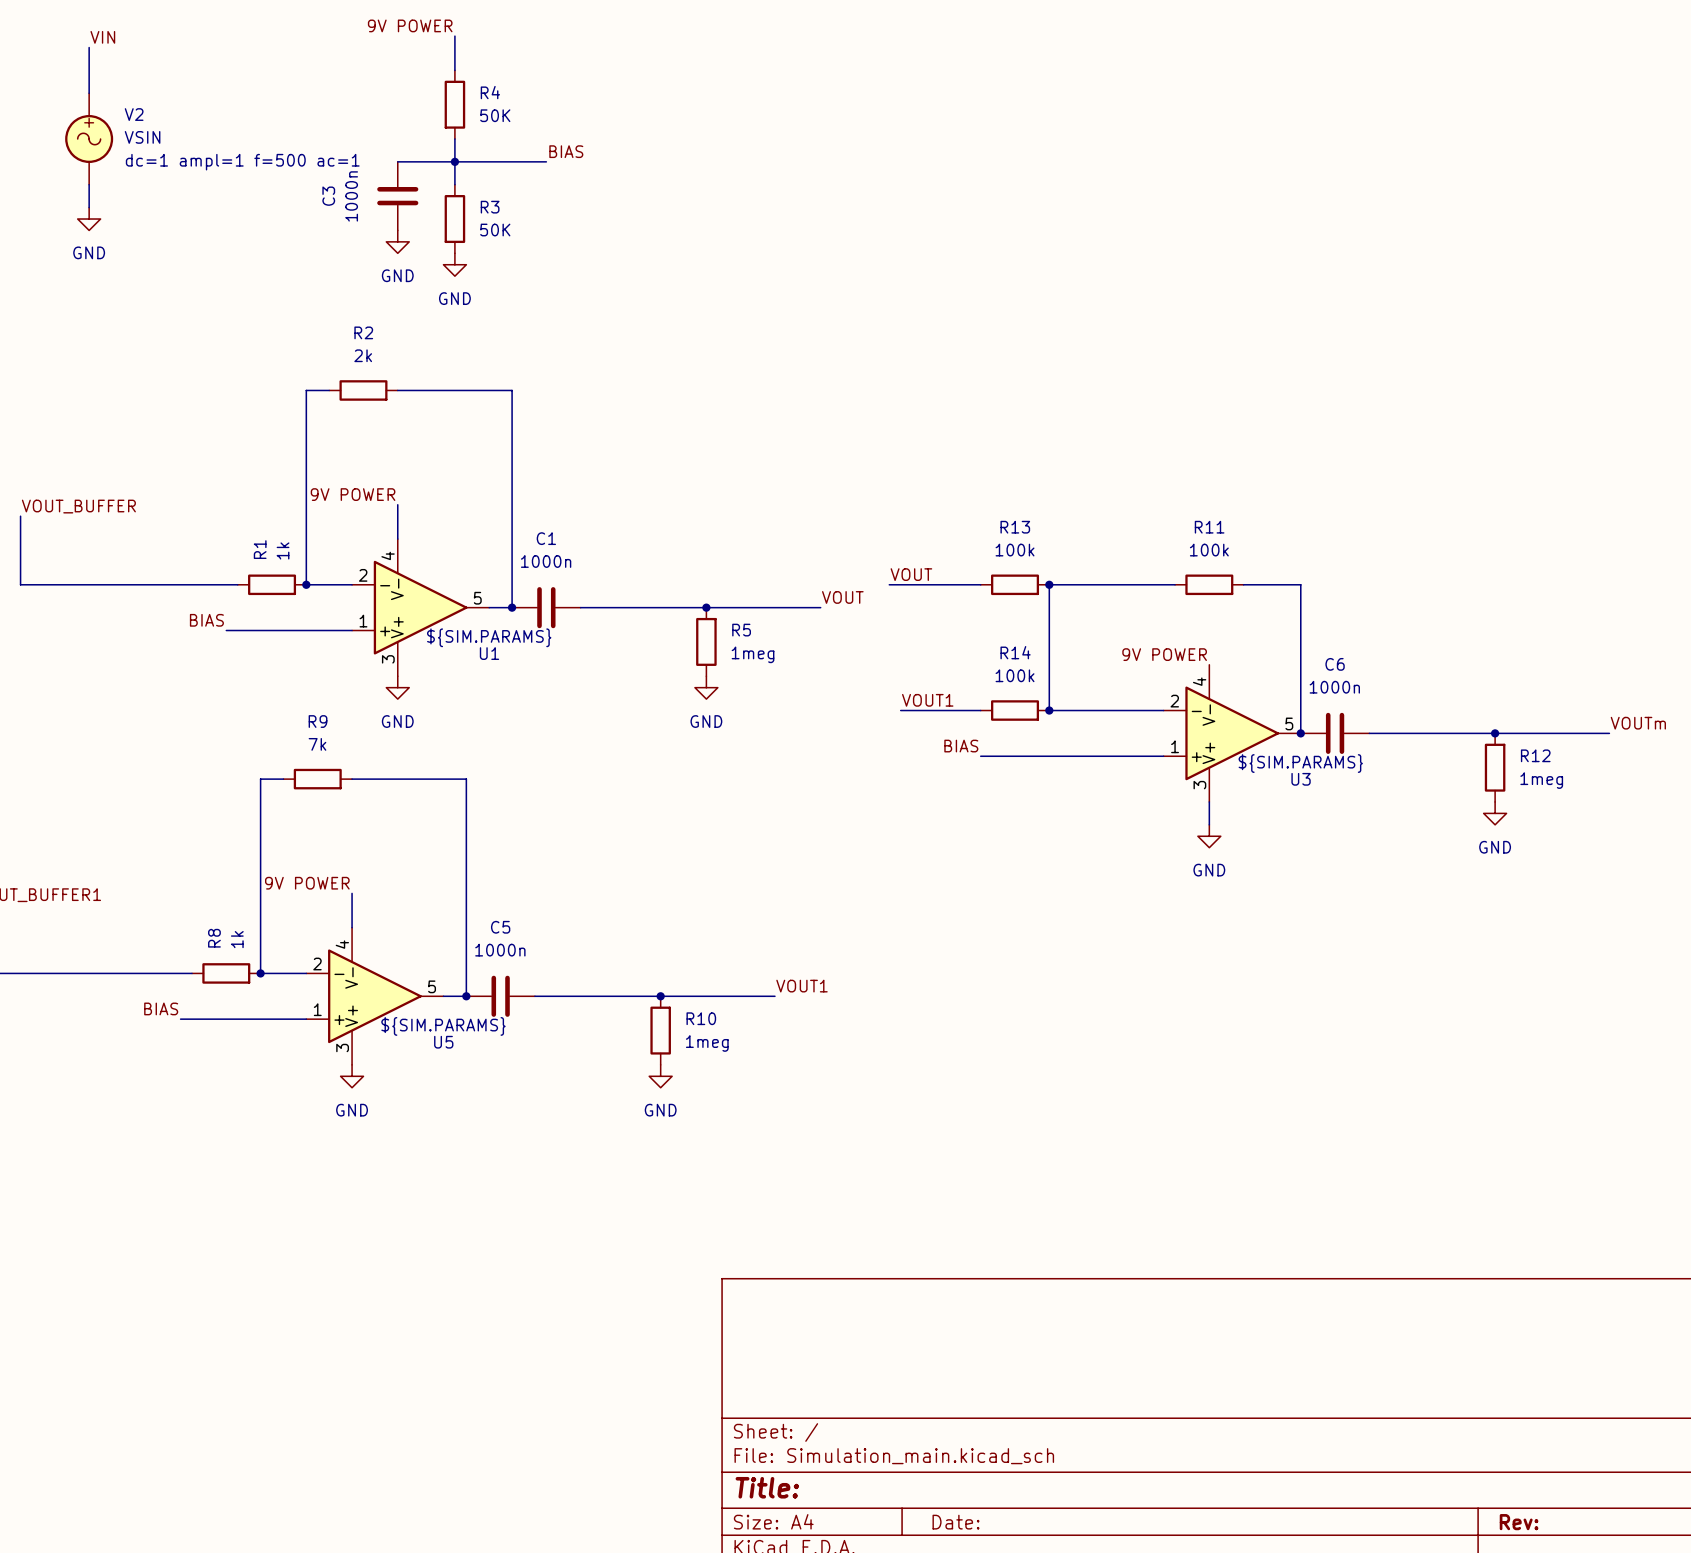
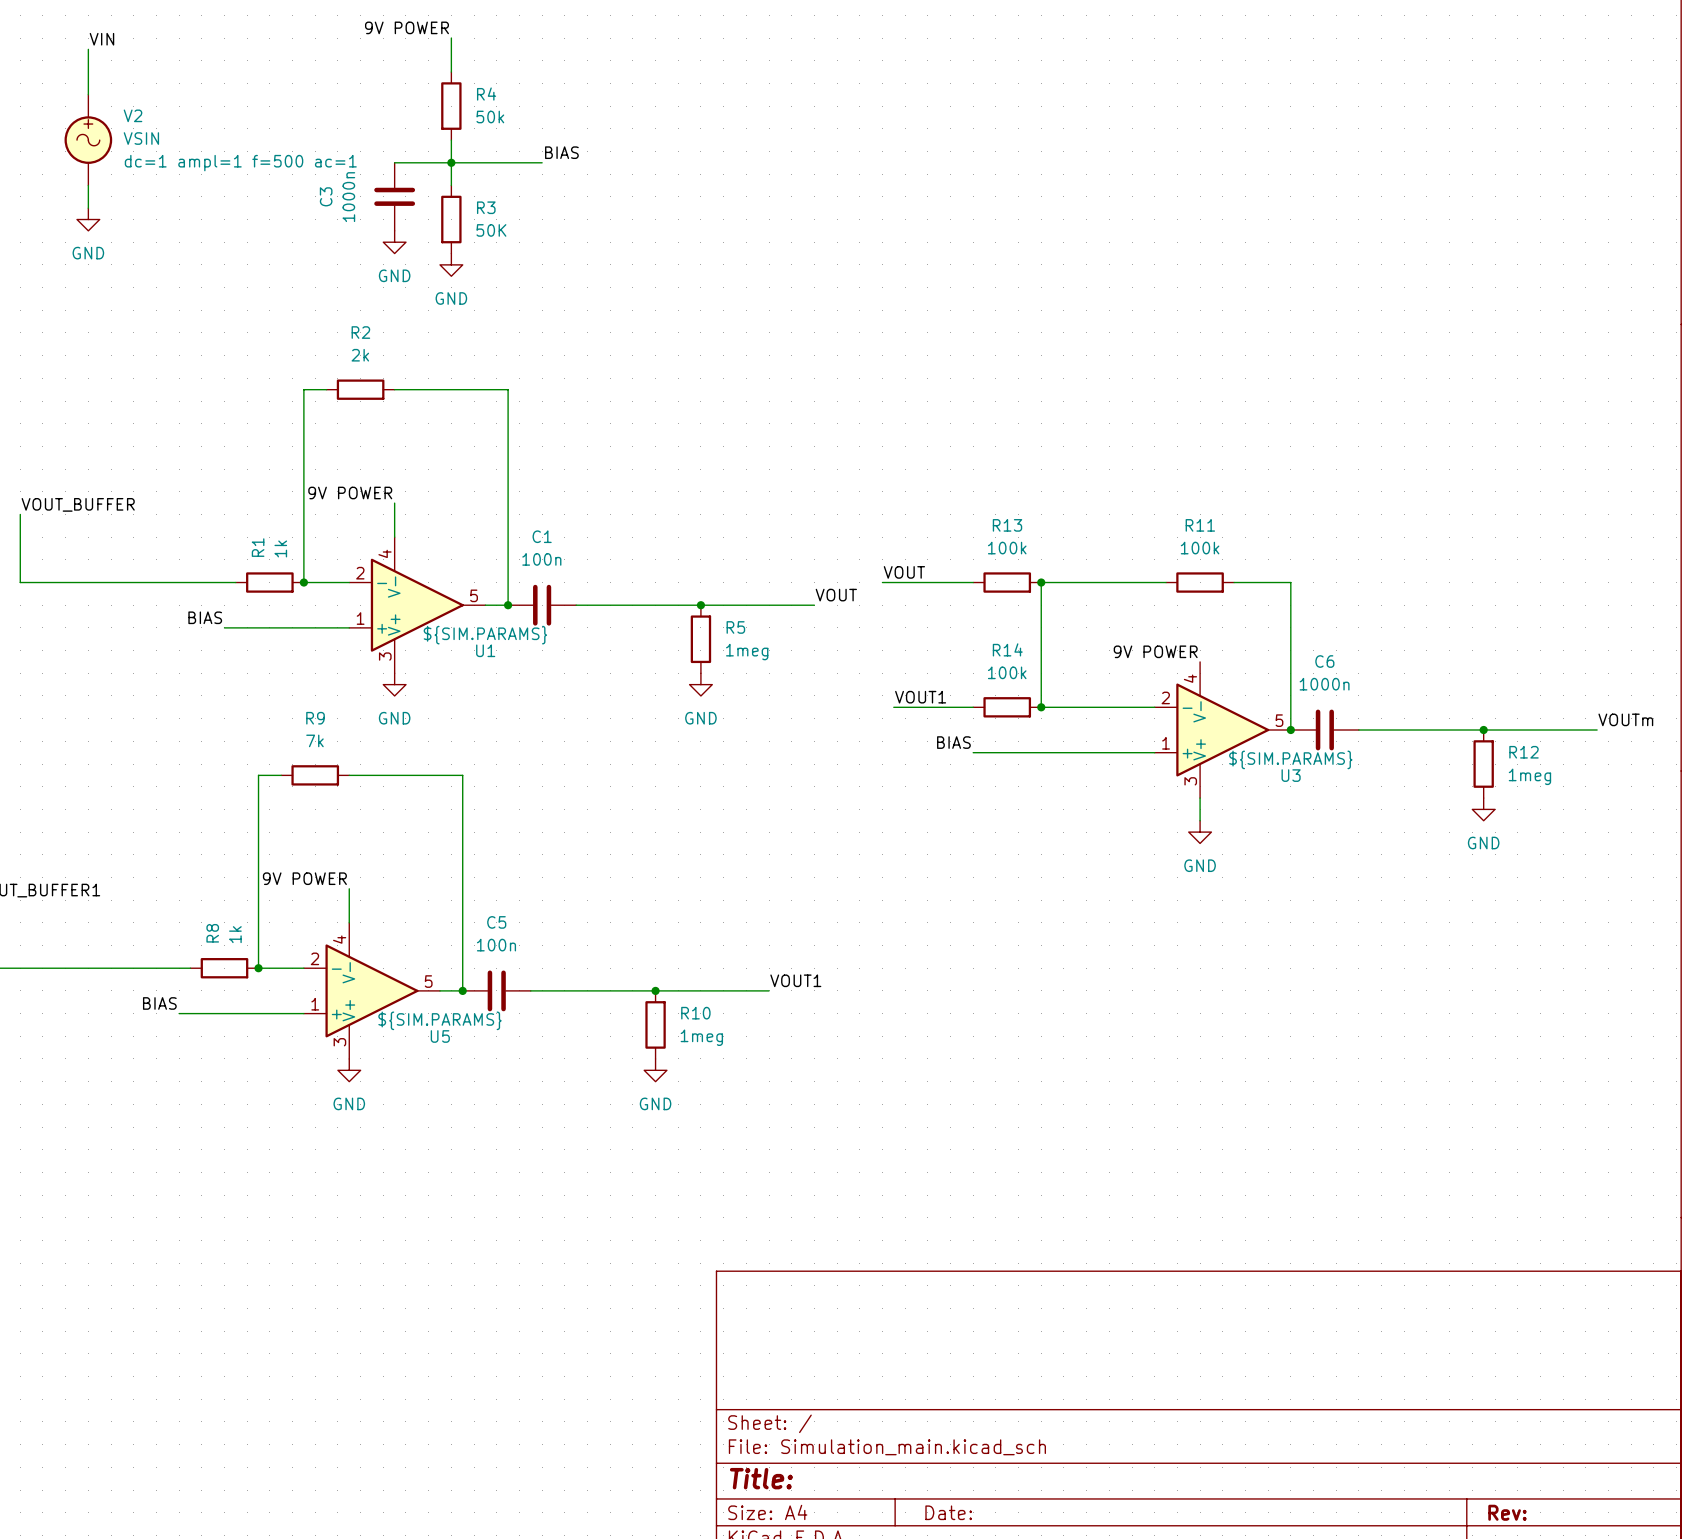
R4 value: 50K (495, 115) -> 50k (490, 116)
C1 value: 1000n (546, 561) -> 100n (541, 559)
C5 value: 1000n (500, 950) -> 100n (496, 945)

